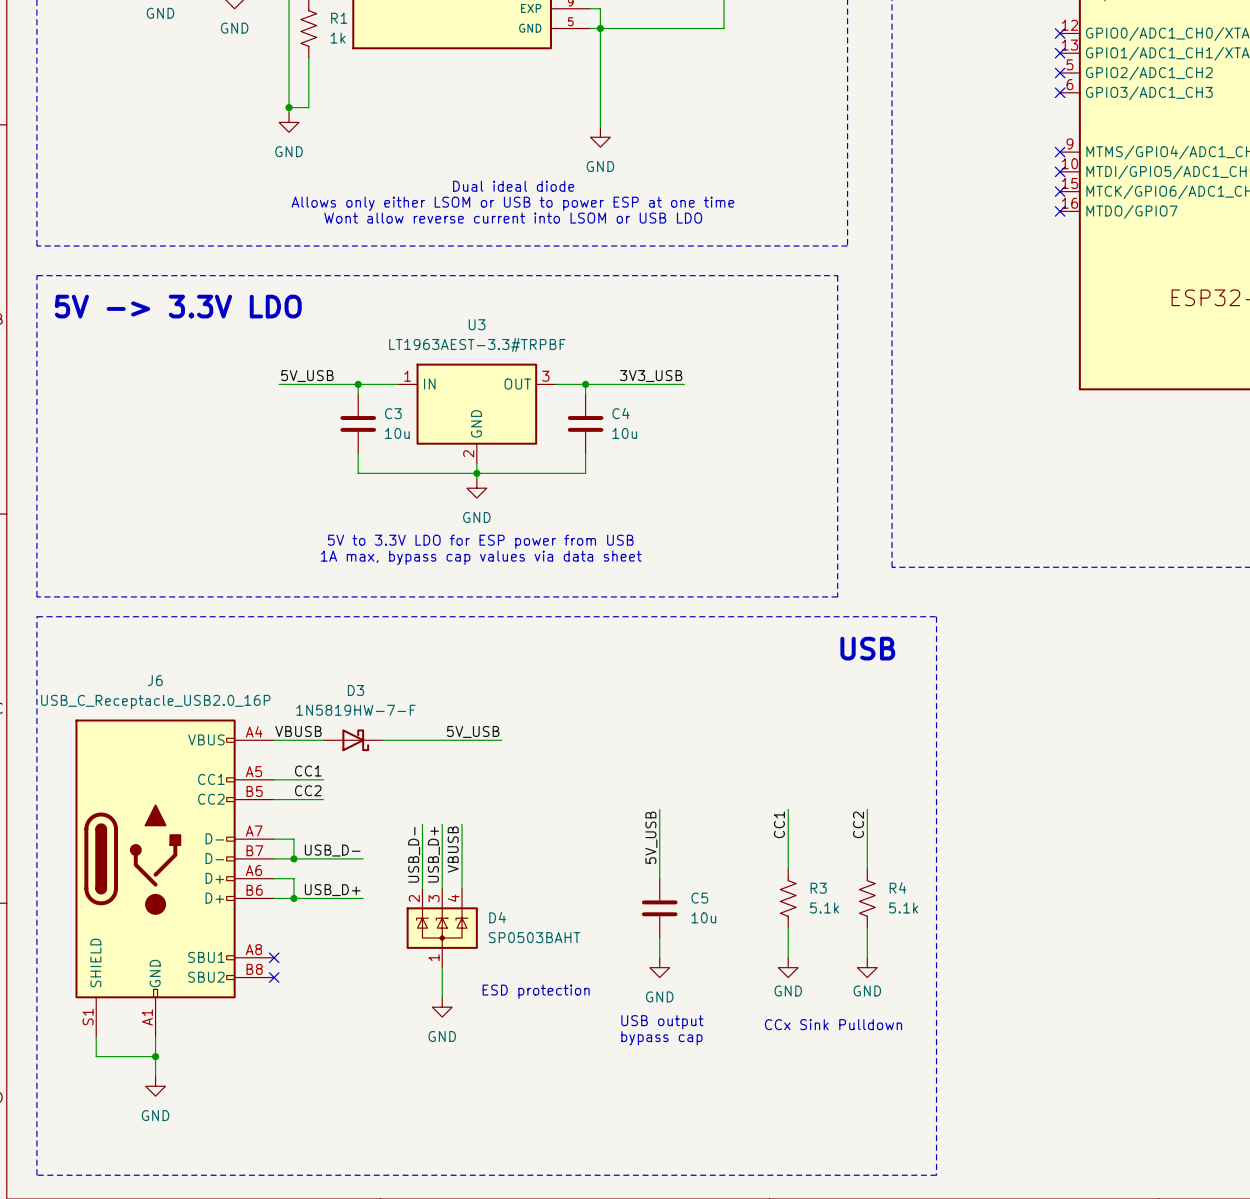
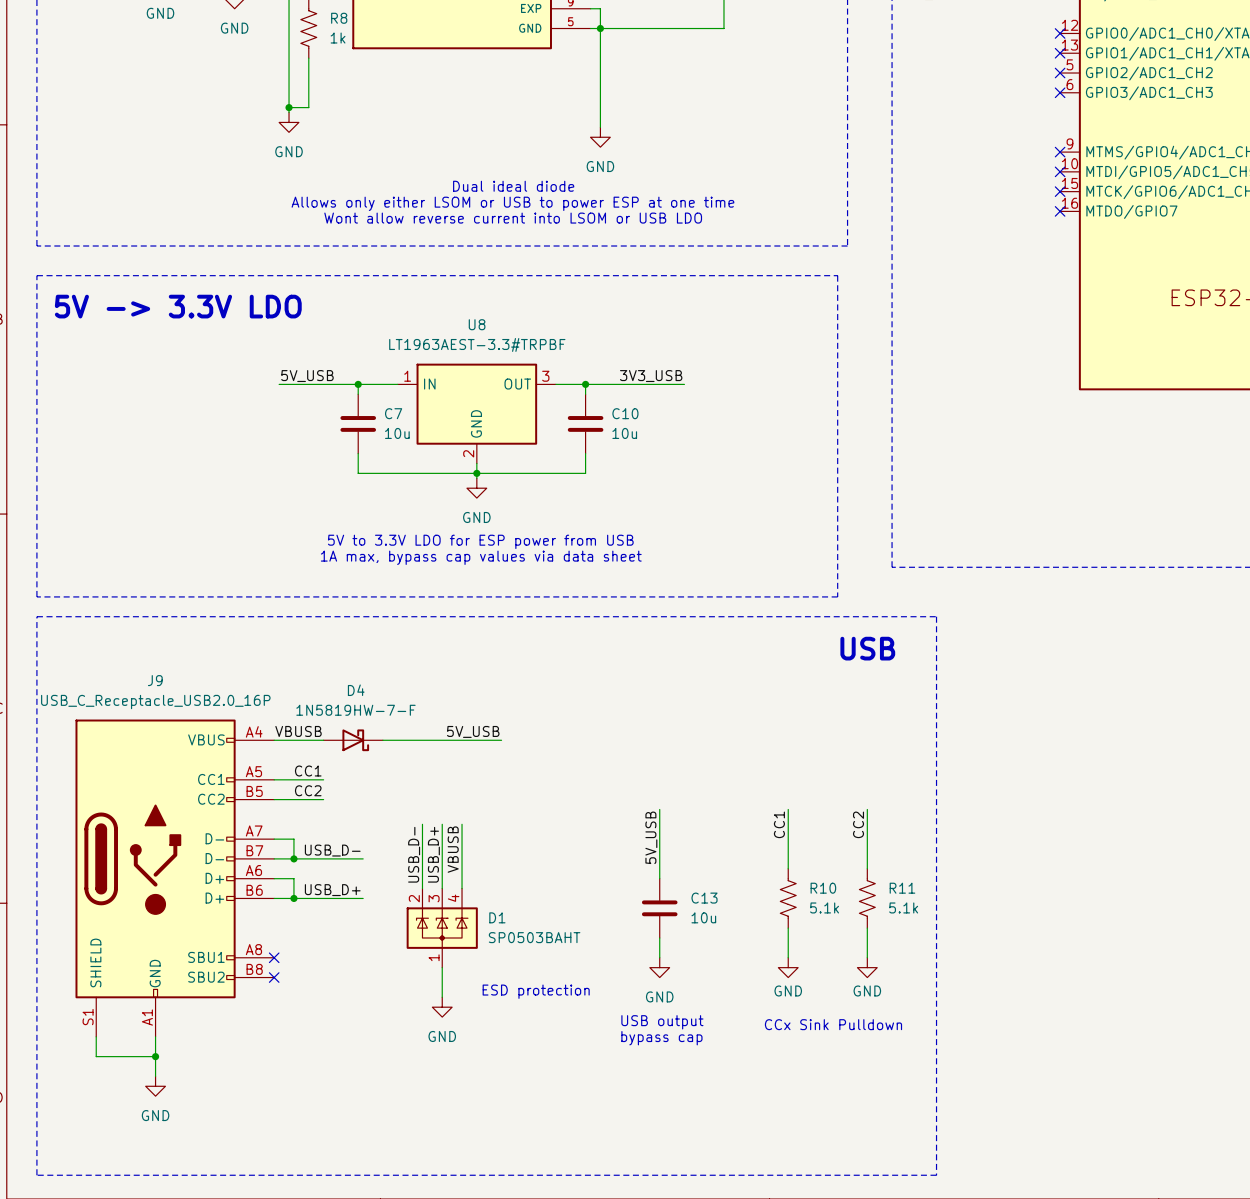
R1 name: R1 (339, 18) -> R8 (339, 18)
U3 name: U3 (477, 324) -> U8 (477, 324)
C3 name: C3 (393, 413) -> C7 (393, 413)
C4 name: C4 (620, 413) -> C10 (625, 413)
J6 name: J6 (155, 680) -> J9 (155, 680)
D3 name: D3 (355, 690) -> D4 (356, 690)
R4 name: R4 (898, 887) -> R11 (902, 888)
R3 name: R3 (818, 888) -> R10 (823, 888)
C5 name: C5 (699, 898) -> C13 (704, 898)
D4 name: D4 (497, 917) -> D1 (497, 917)

